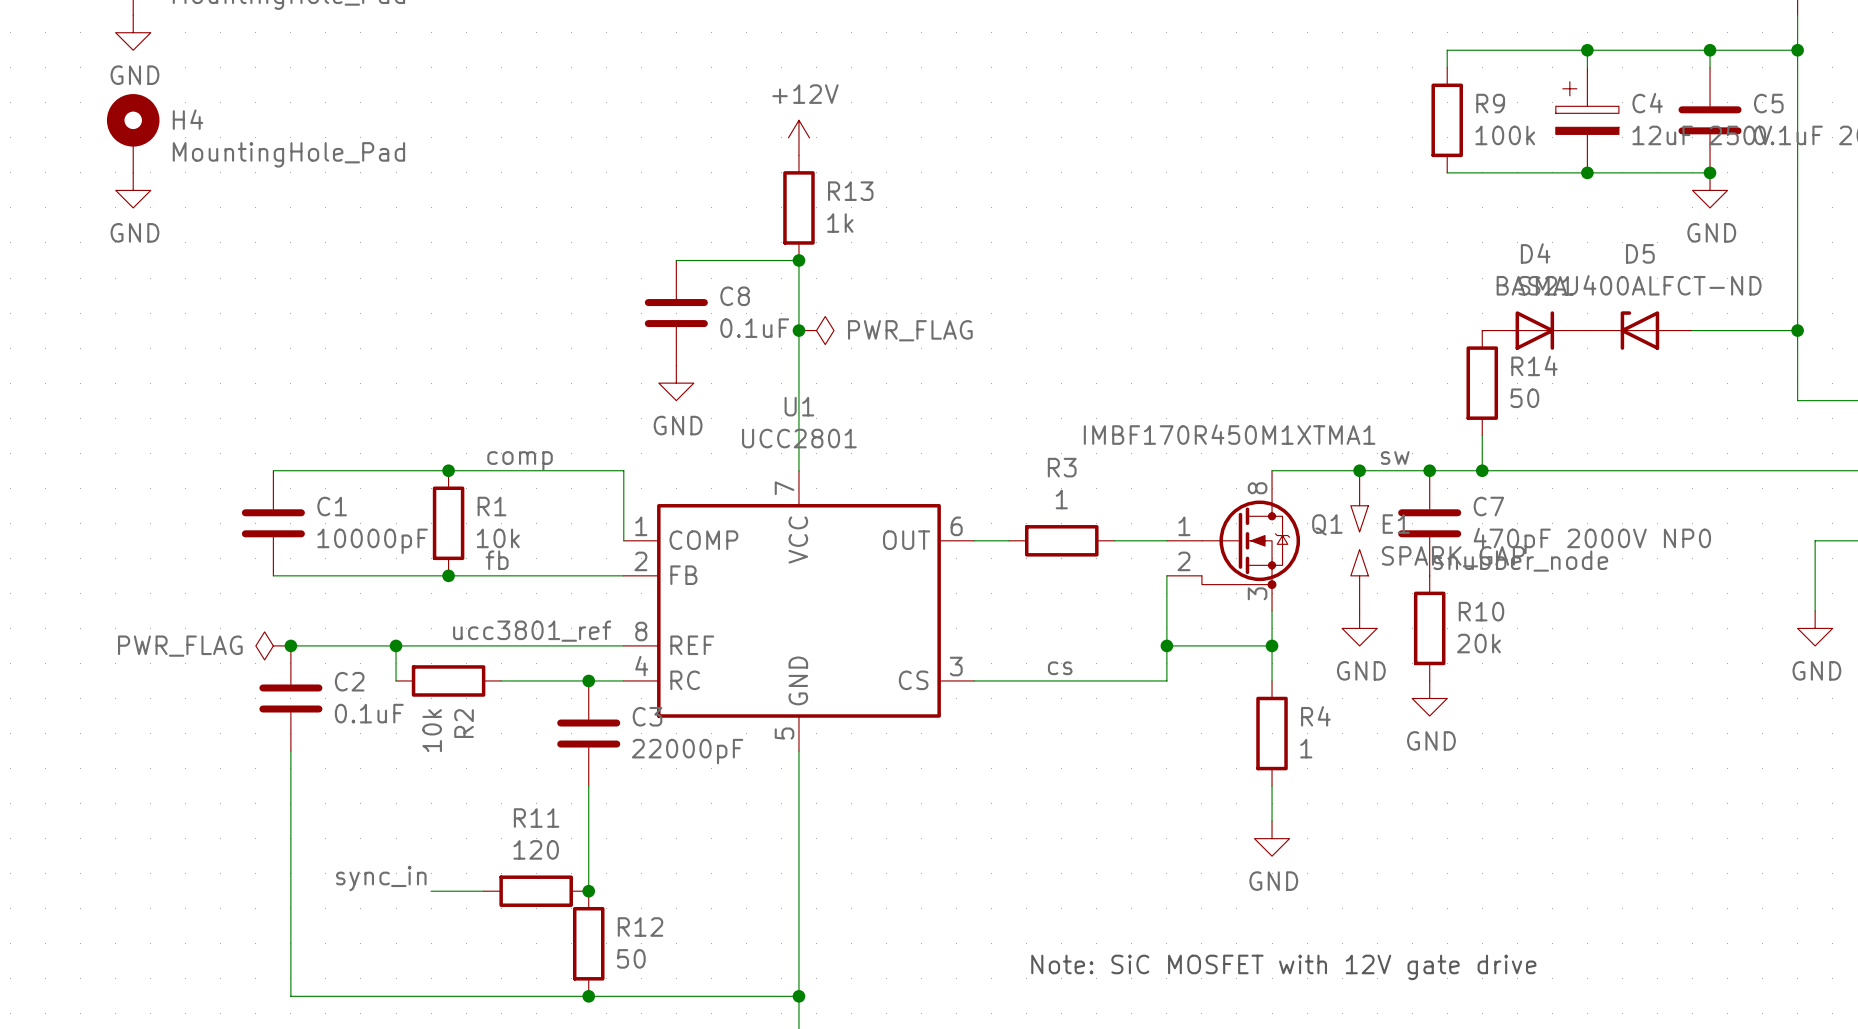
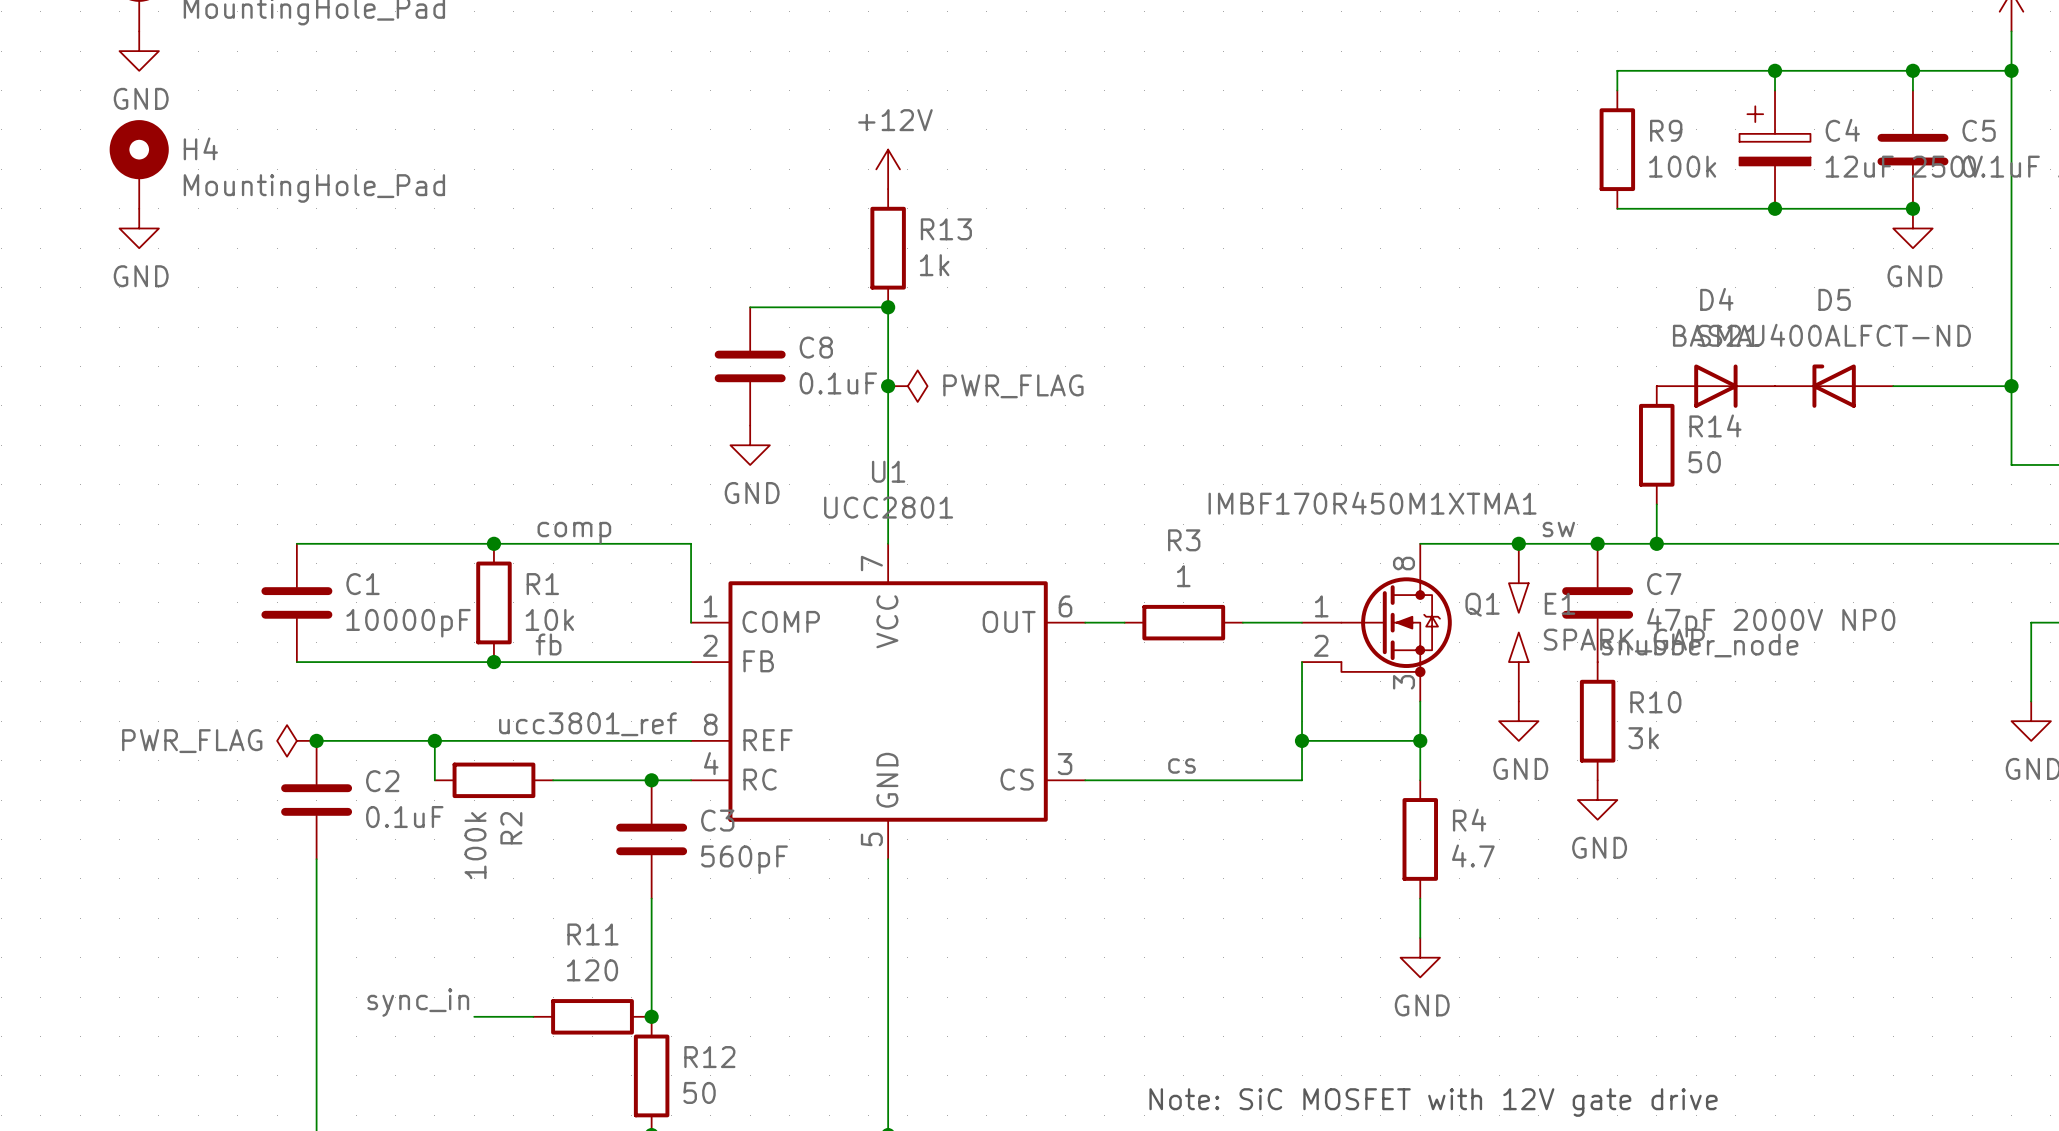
C7 value: 470pF 2000V NP0 (1592, 540) -> 47pF 2000V NP0 (1771, 622)
R10 value: 20k (1478, 643) -> 3k (1643, 738)
R2 value: 10k (432, 730) -> 100k (475, 845)
R4 value: 1 (1306, 748) -> 4.7 (1473, 855)
C3 value: 22000pF (687, 751) -> 560pF (744, 859)

